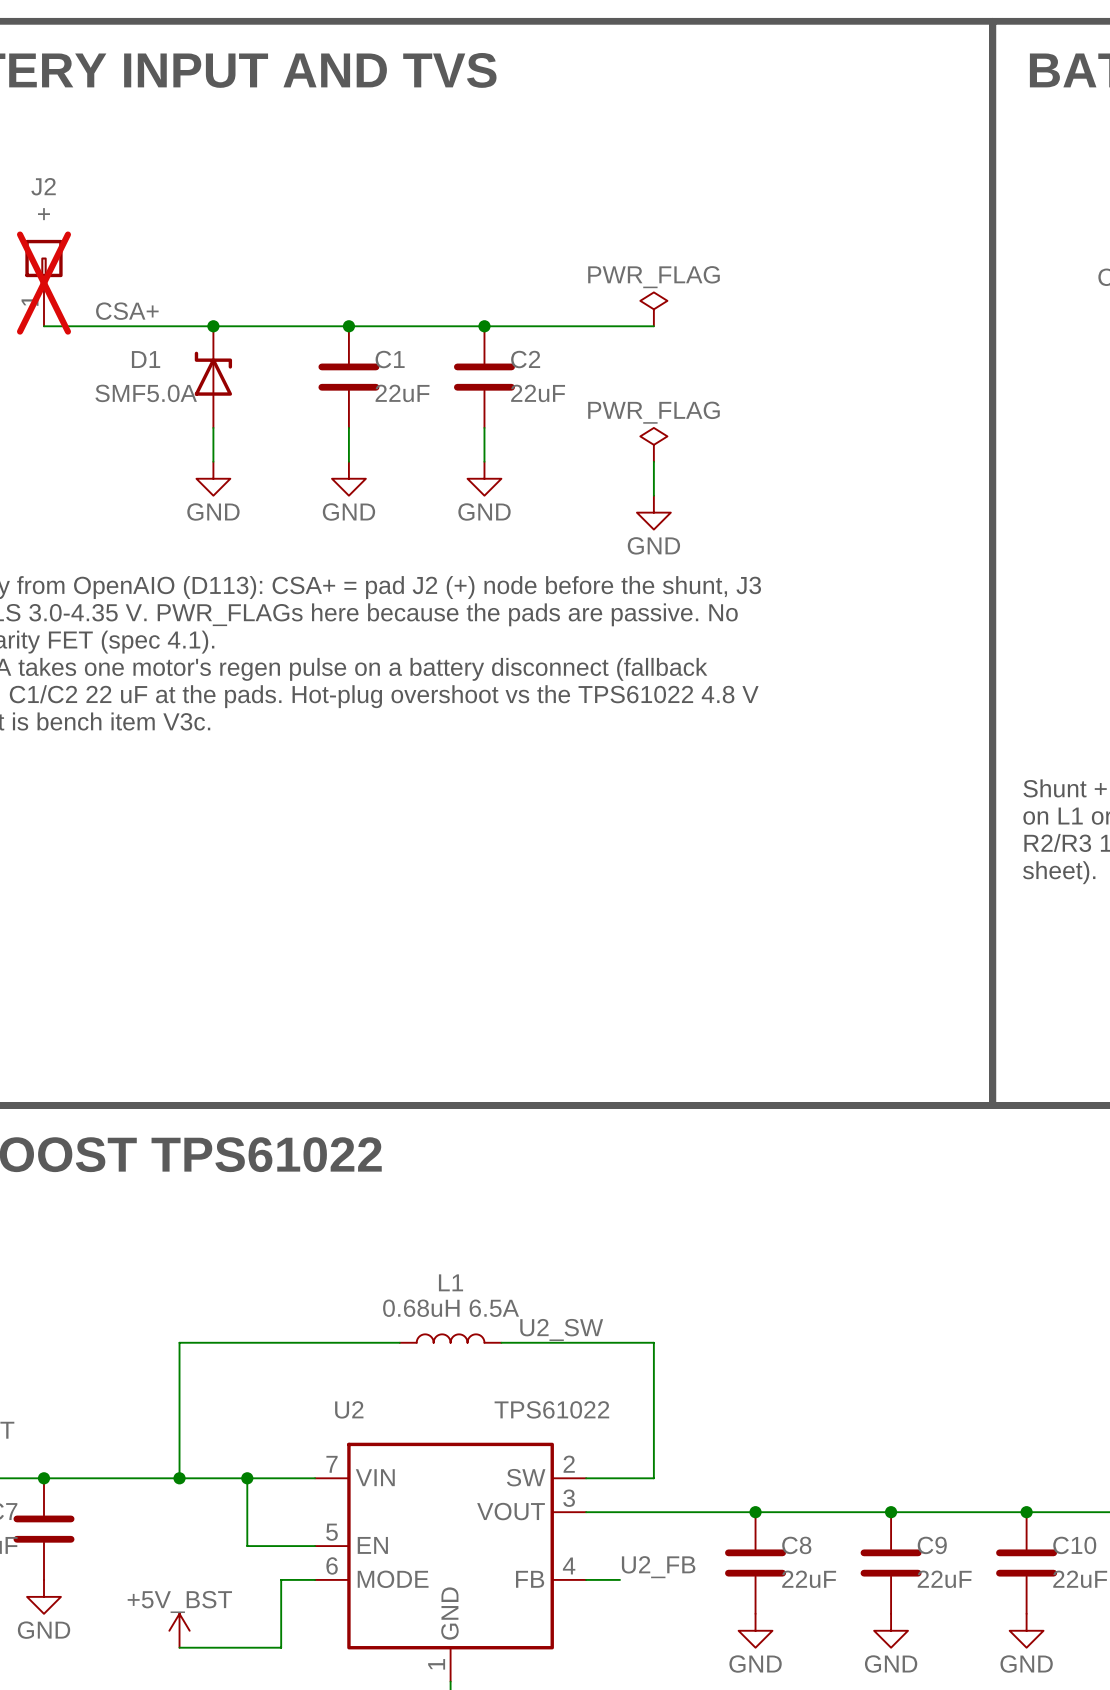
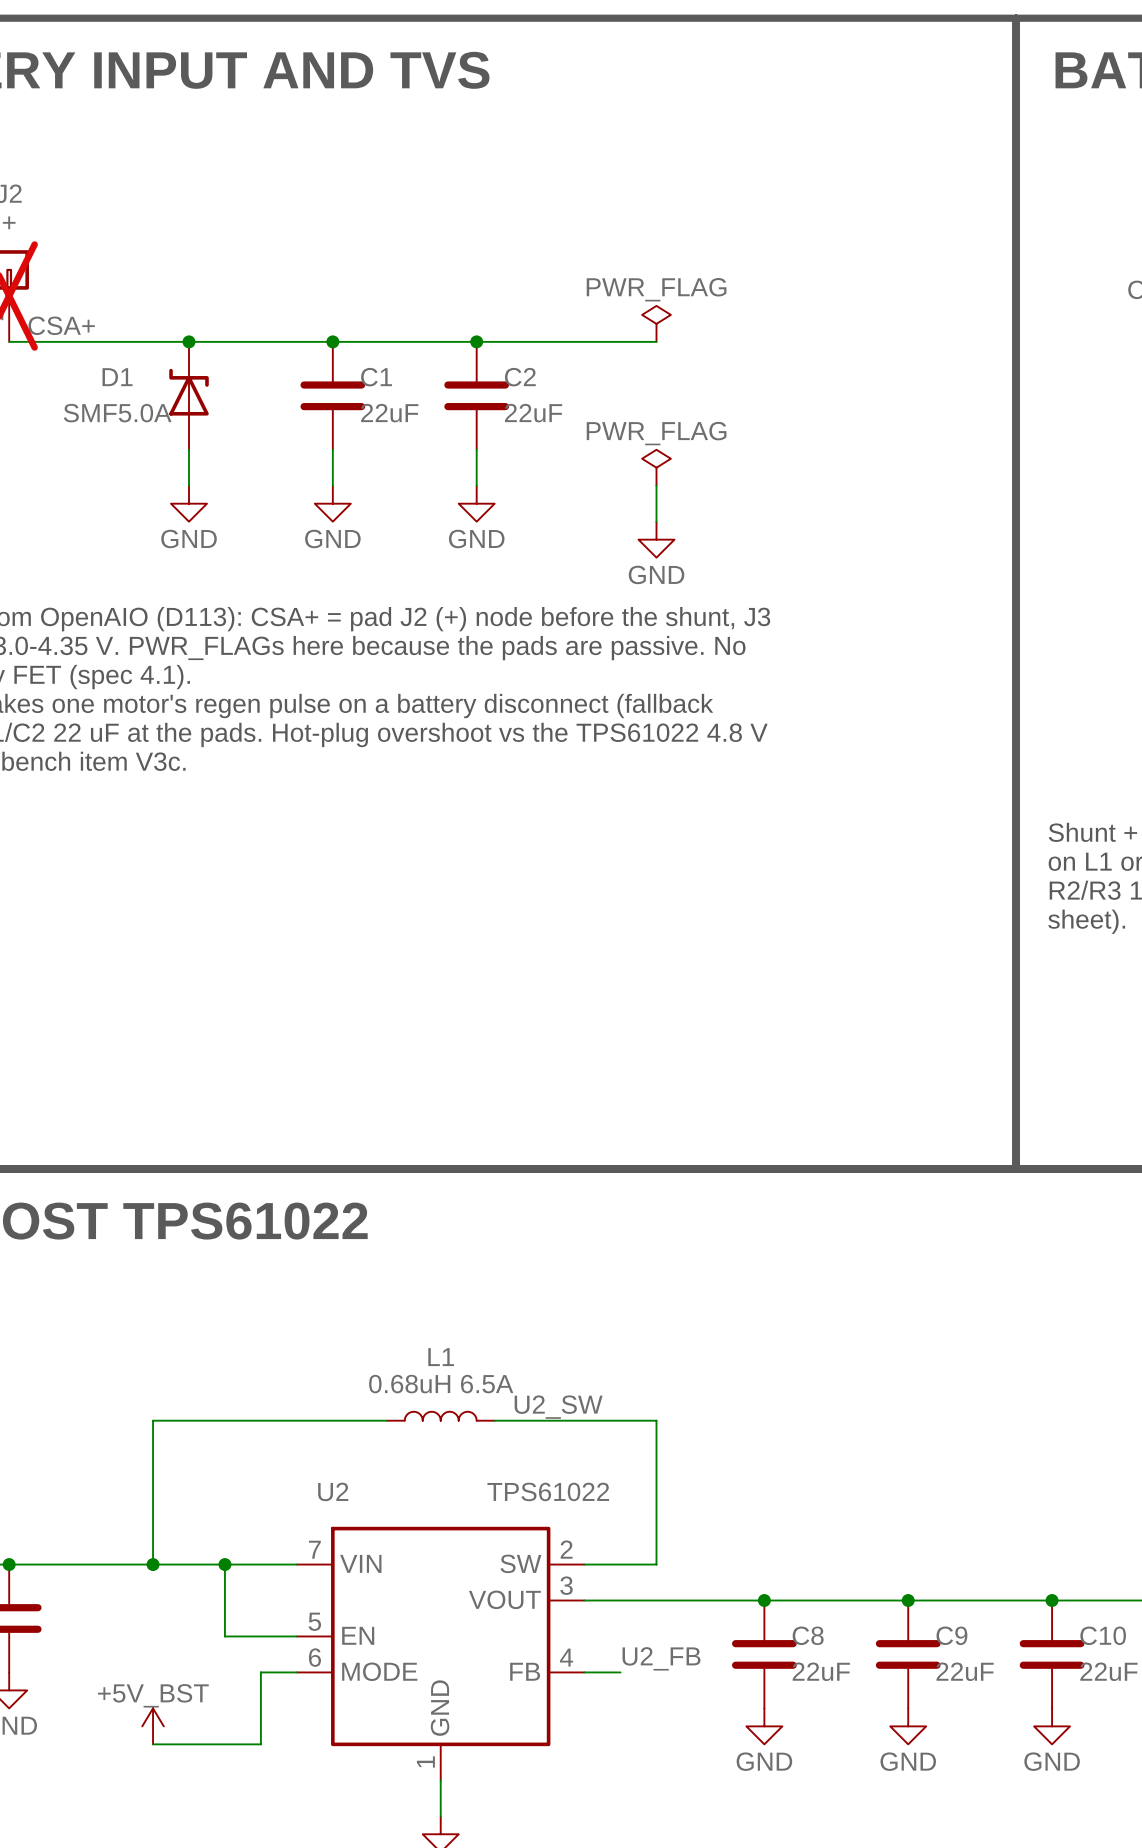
label position: CSA+ (127, 311) -> CSA+ (61, 325)

